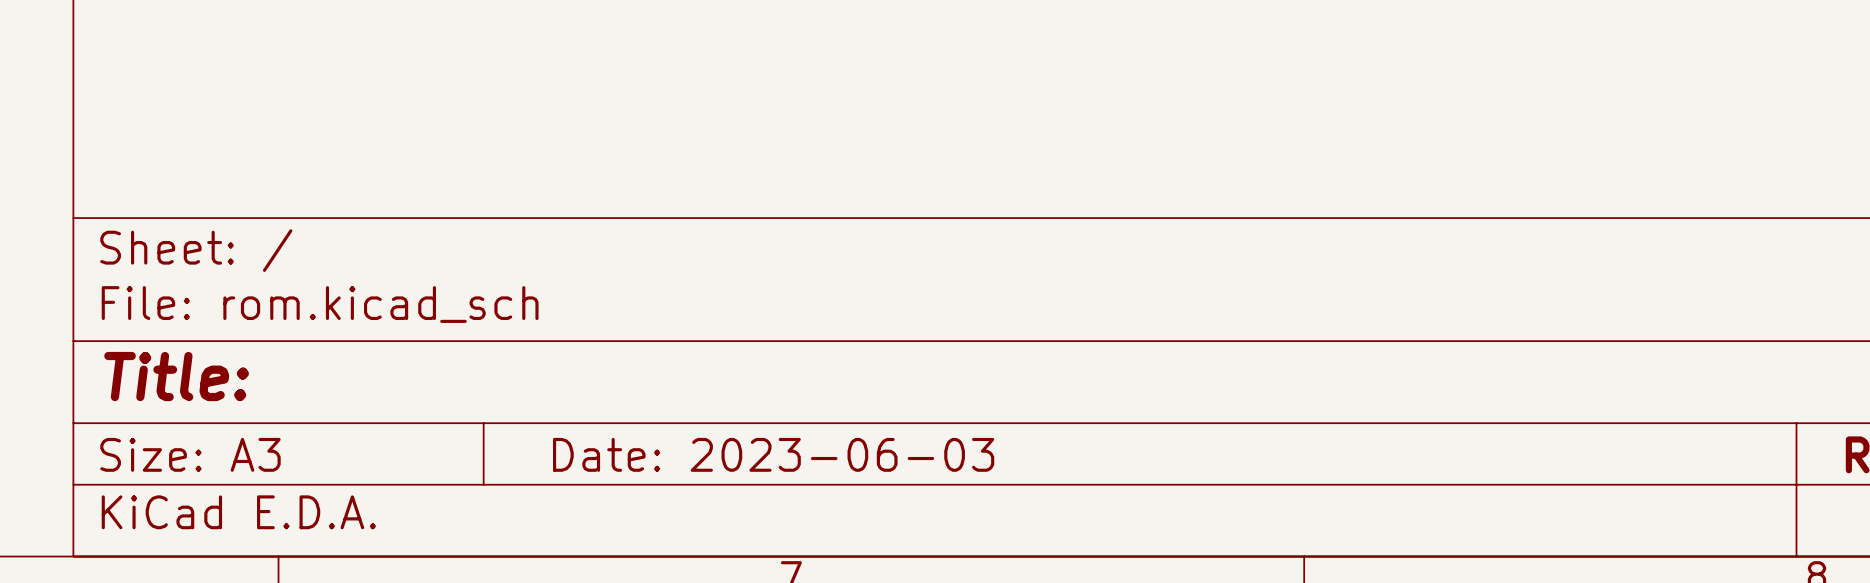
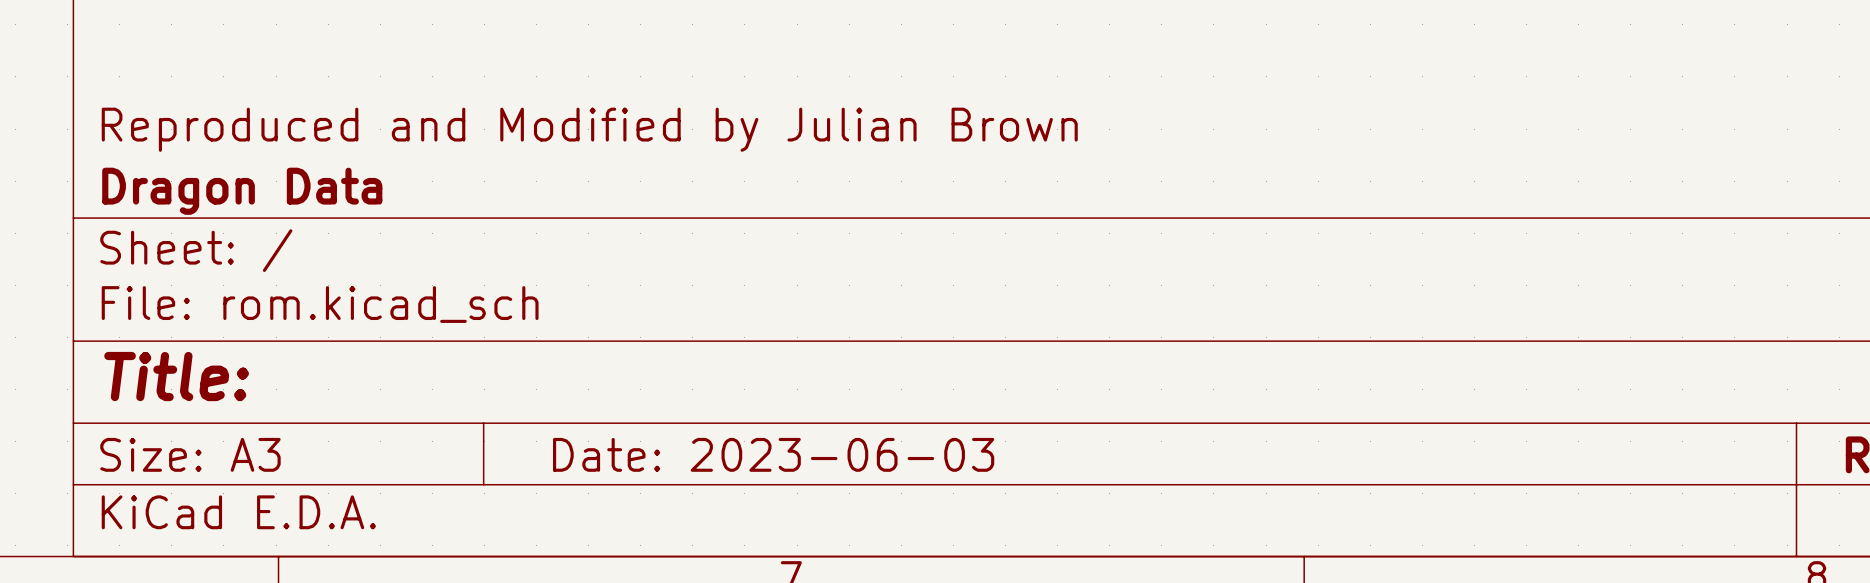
title block: none -> Reproduced and Modified by Julian Brown (589, 129)
title block: none -> Dragon Data (242, 191)

